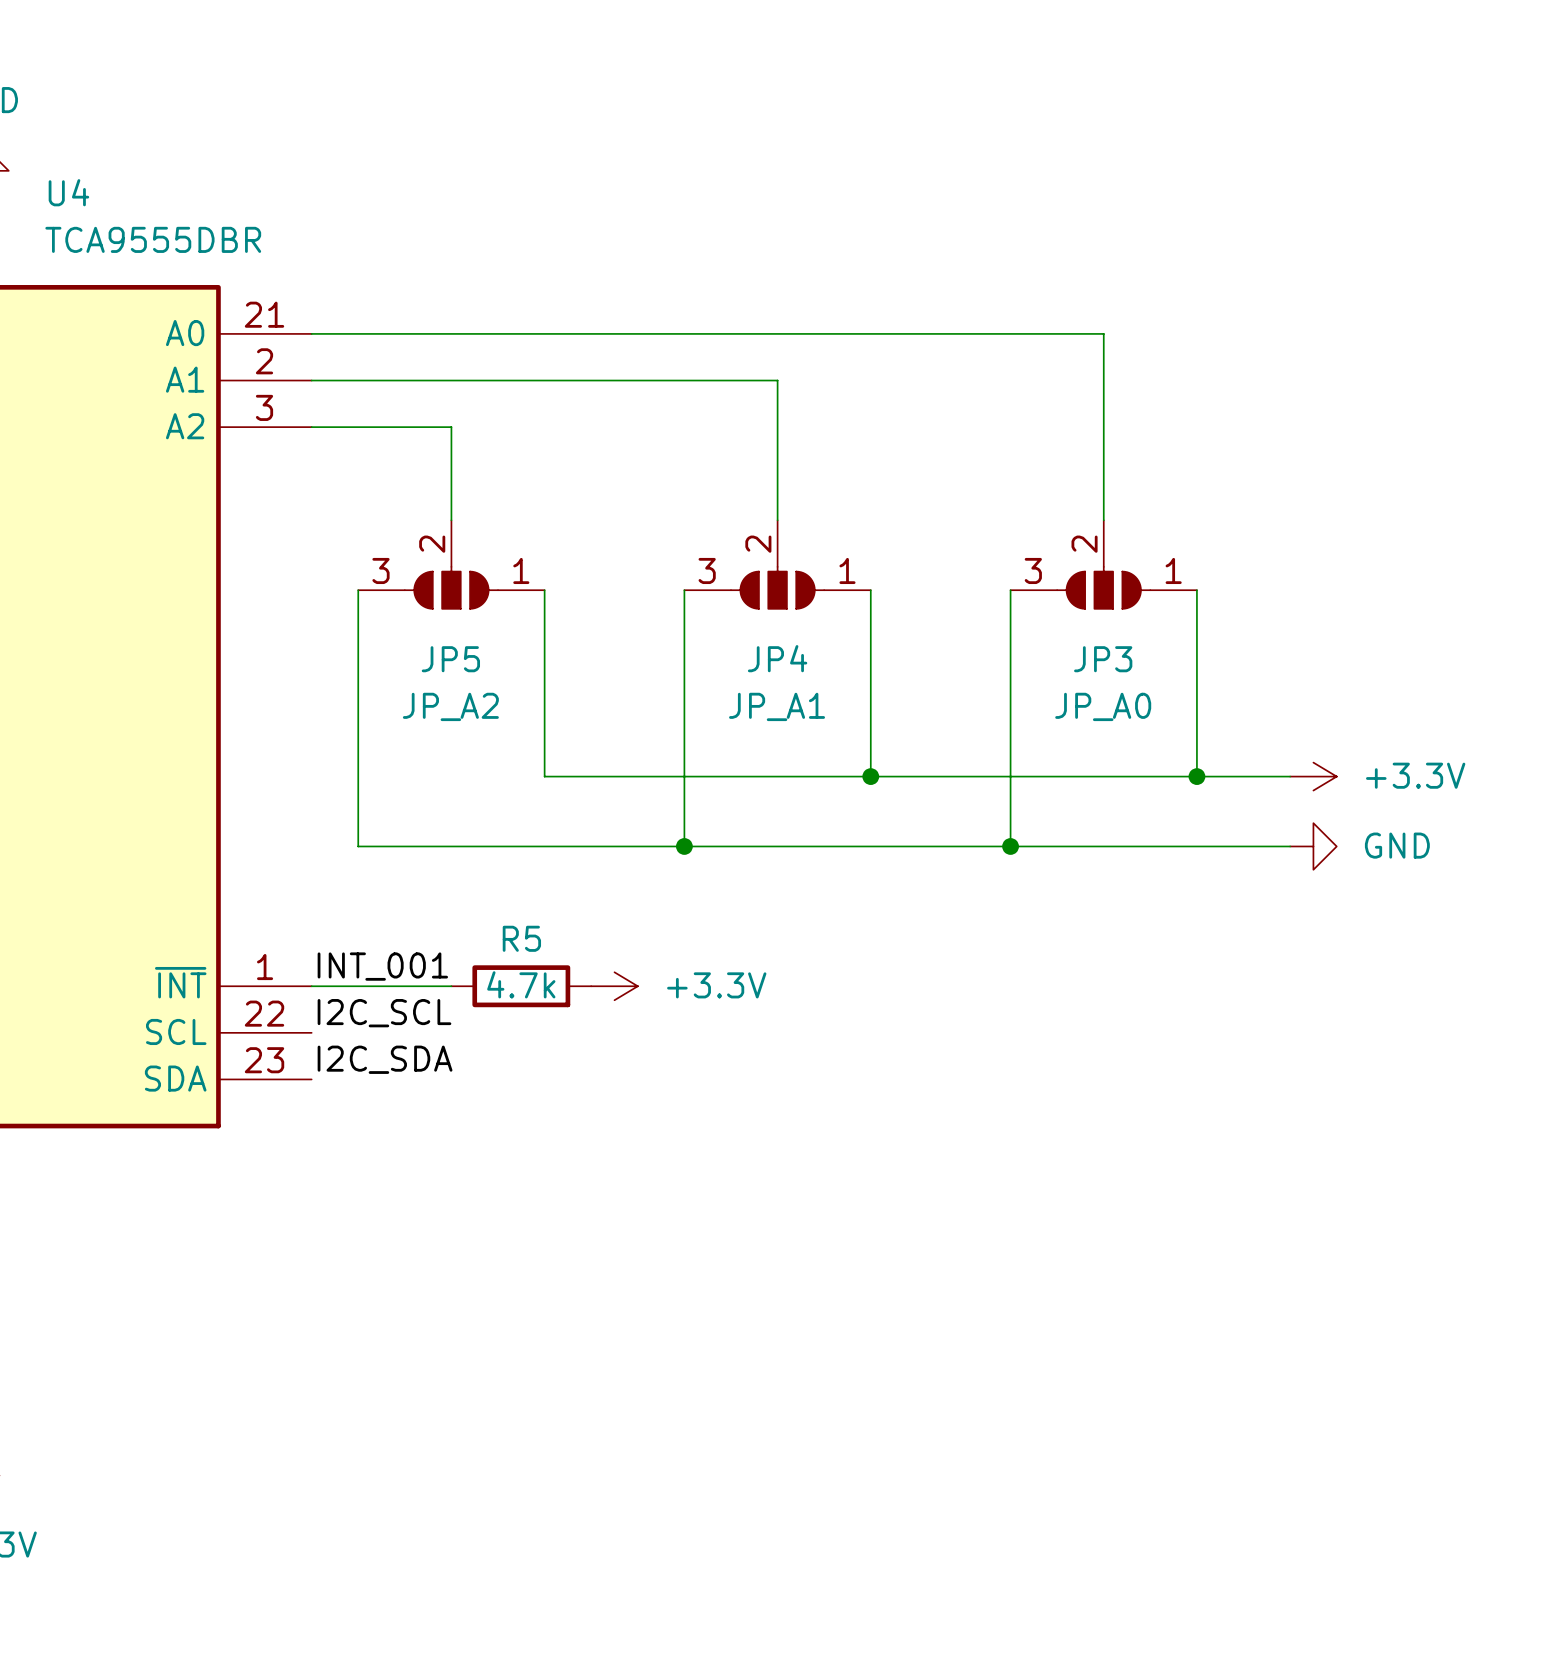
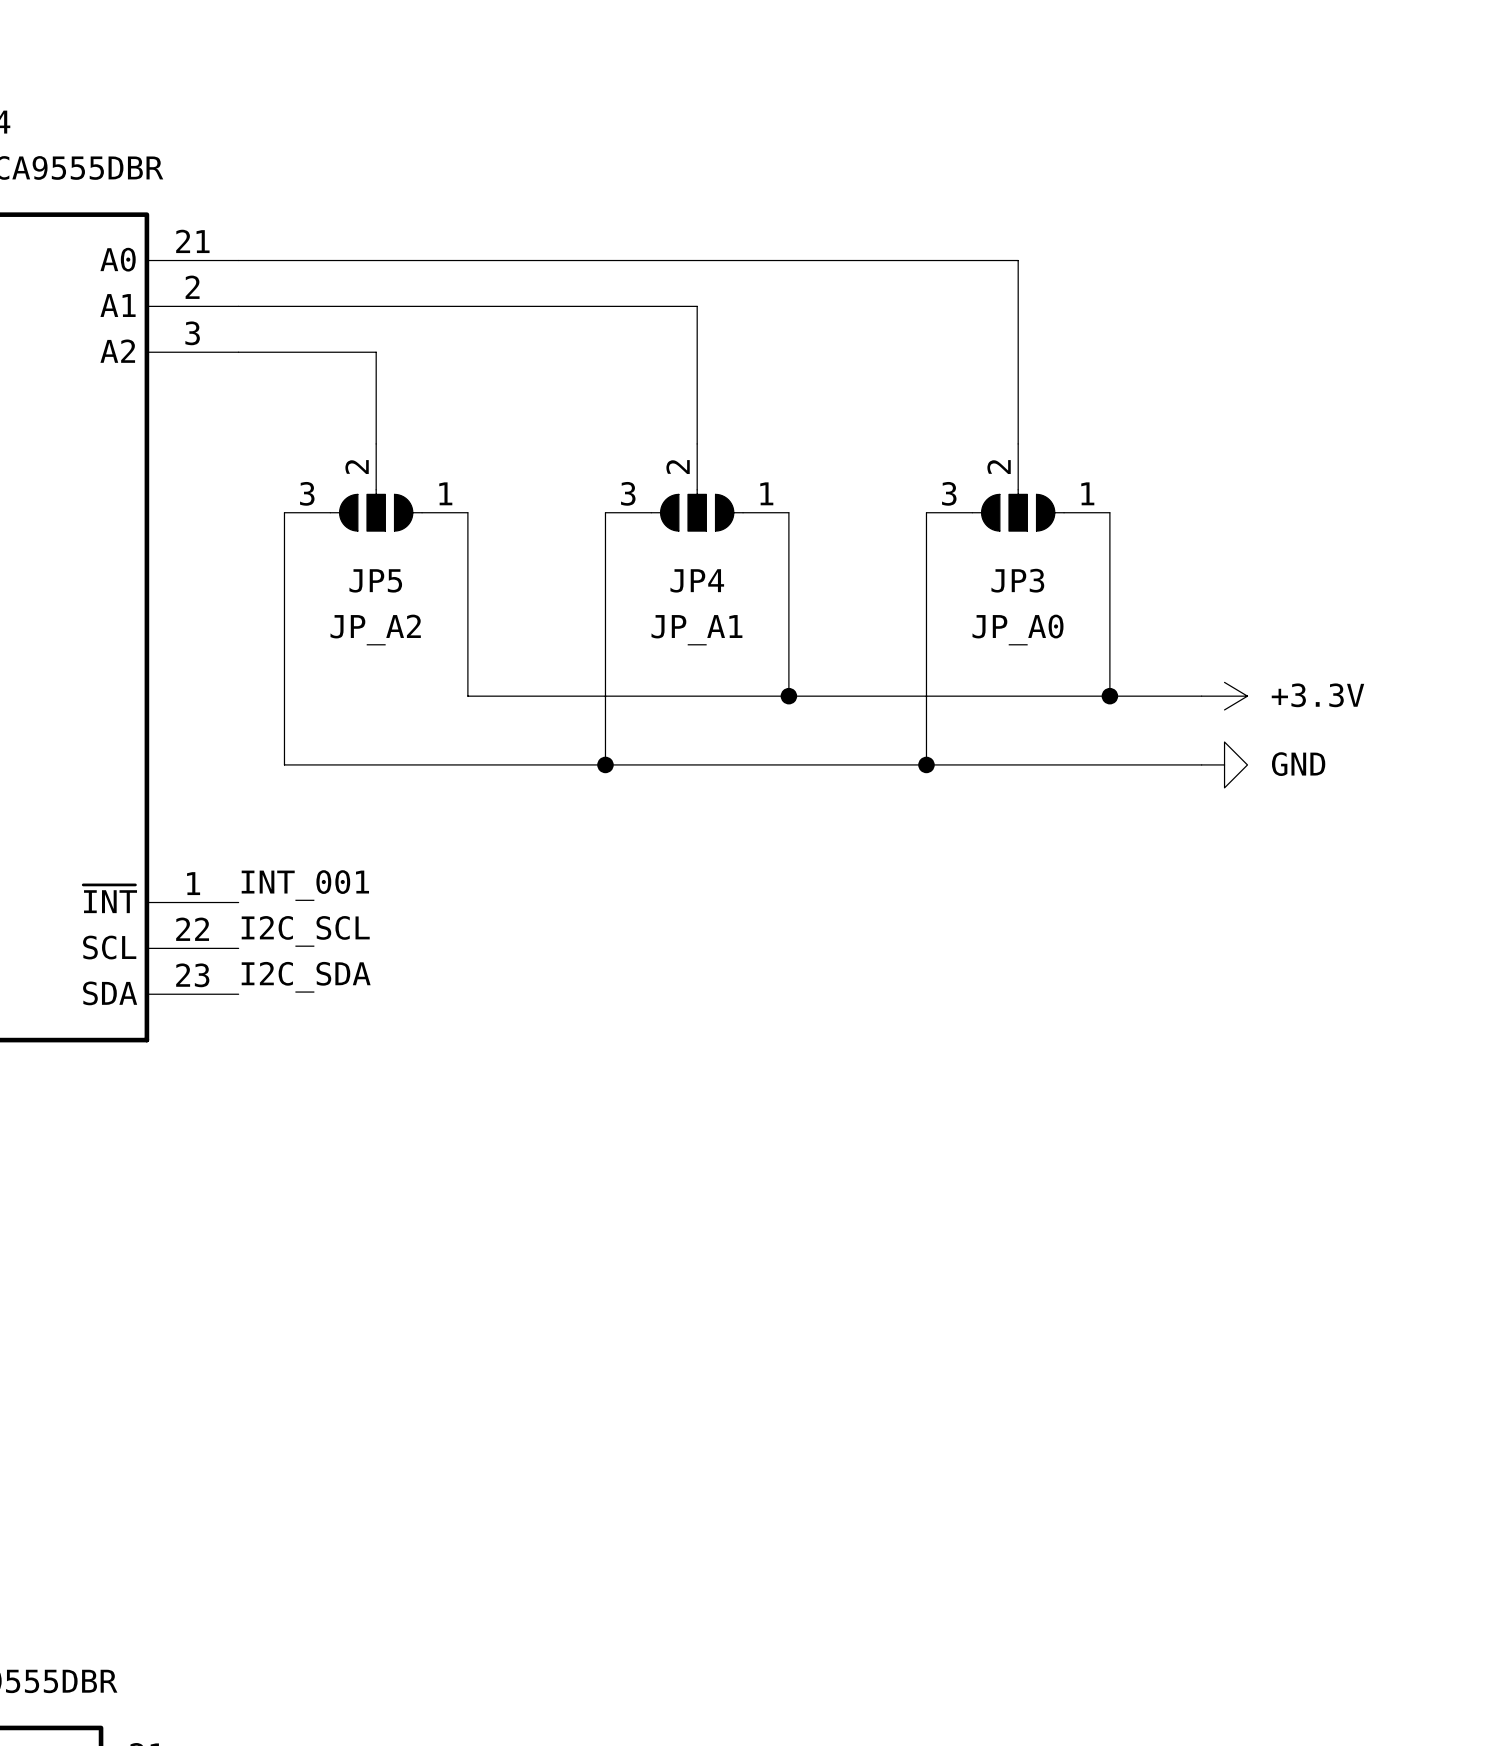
wire: (311, 986) (451, 986) -> none
R5: 4.7k (521, 986) -> none
power symbol: +3.3V (614, 986) -> none

